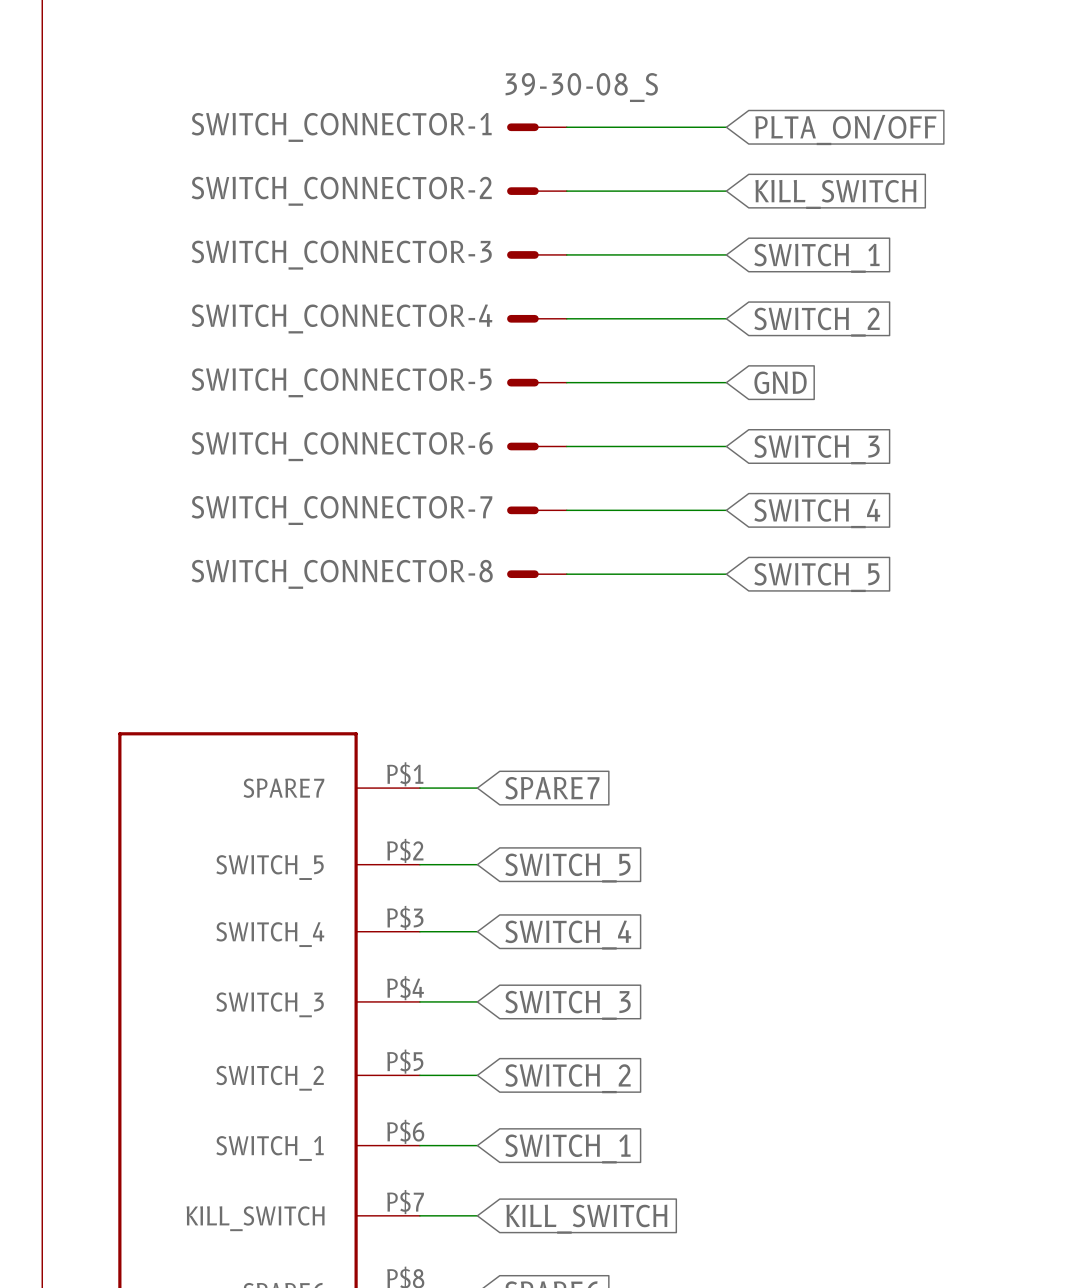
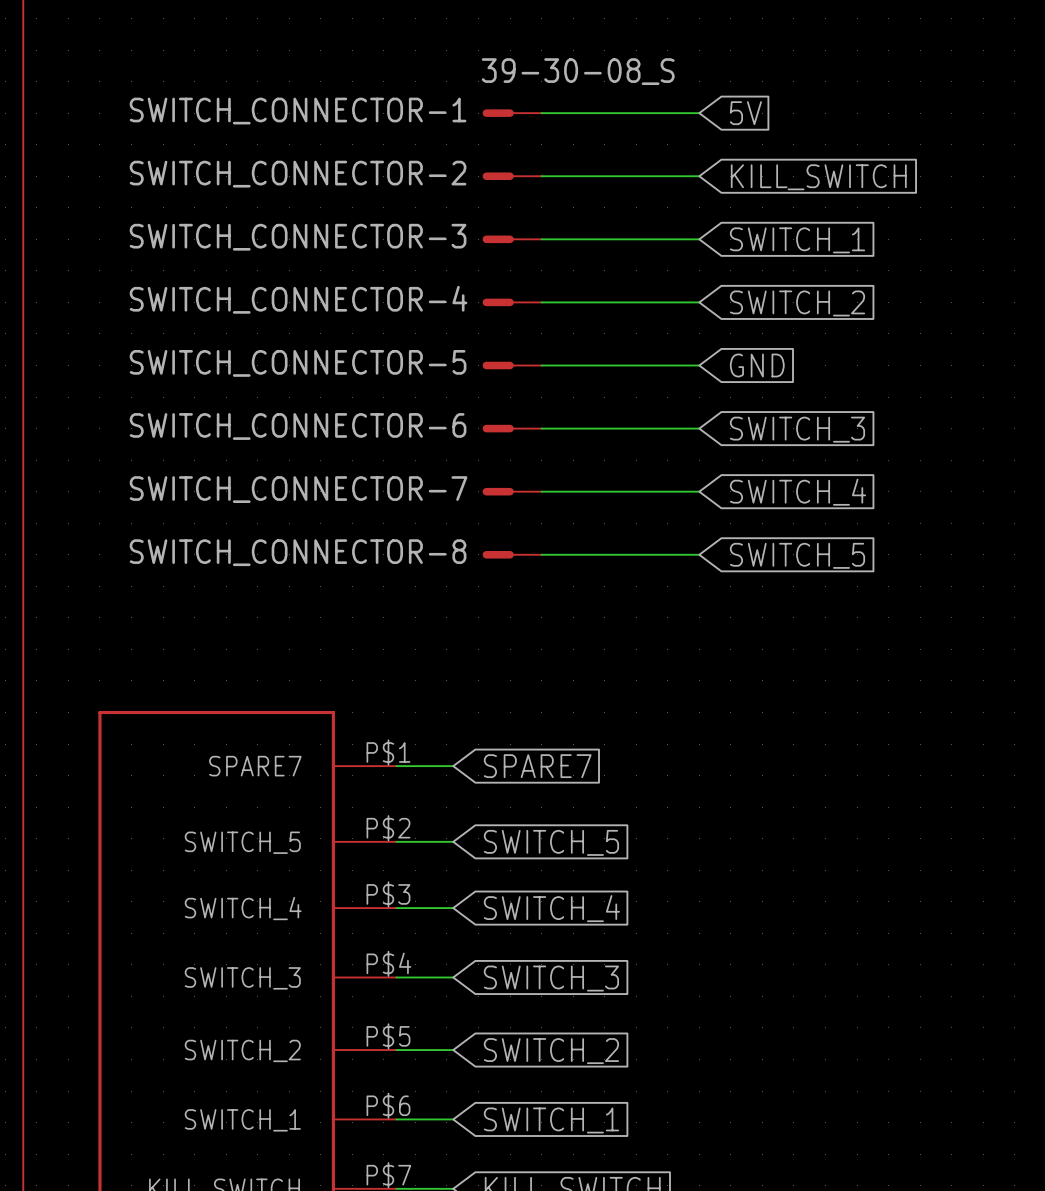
global label: PLTA_ON/OFF (845, 130) -> 5V (745, 113)

